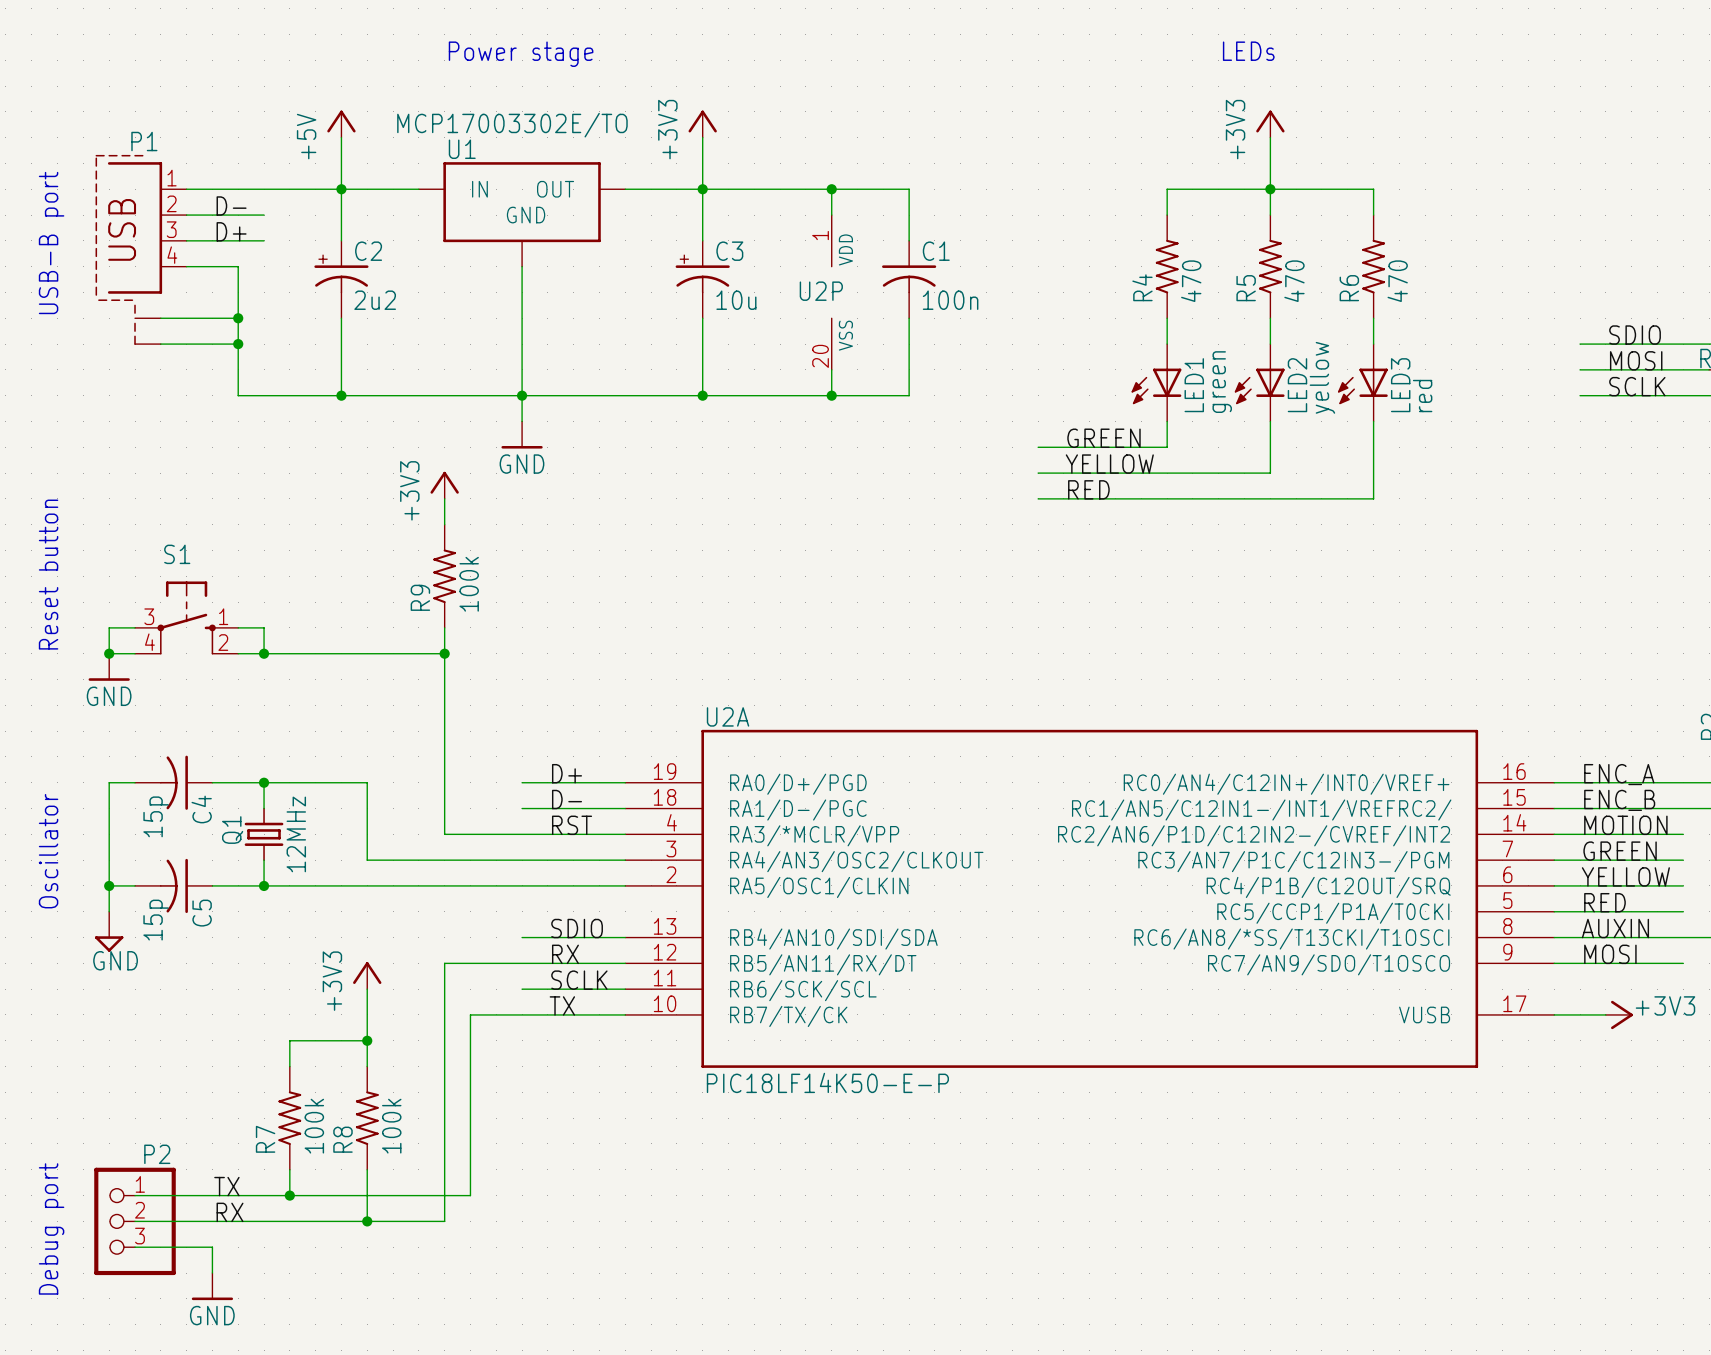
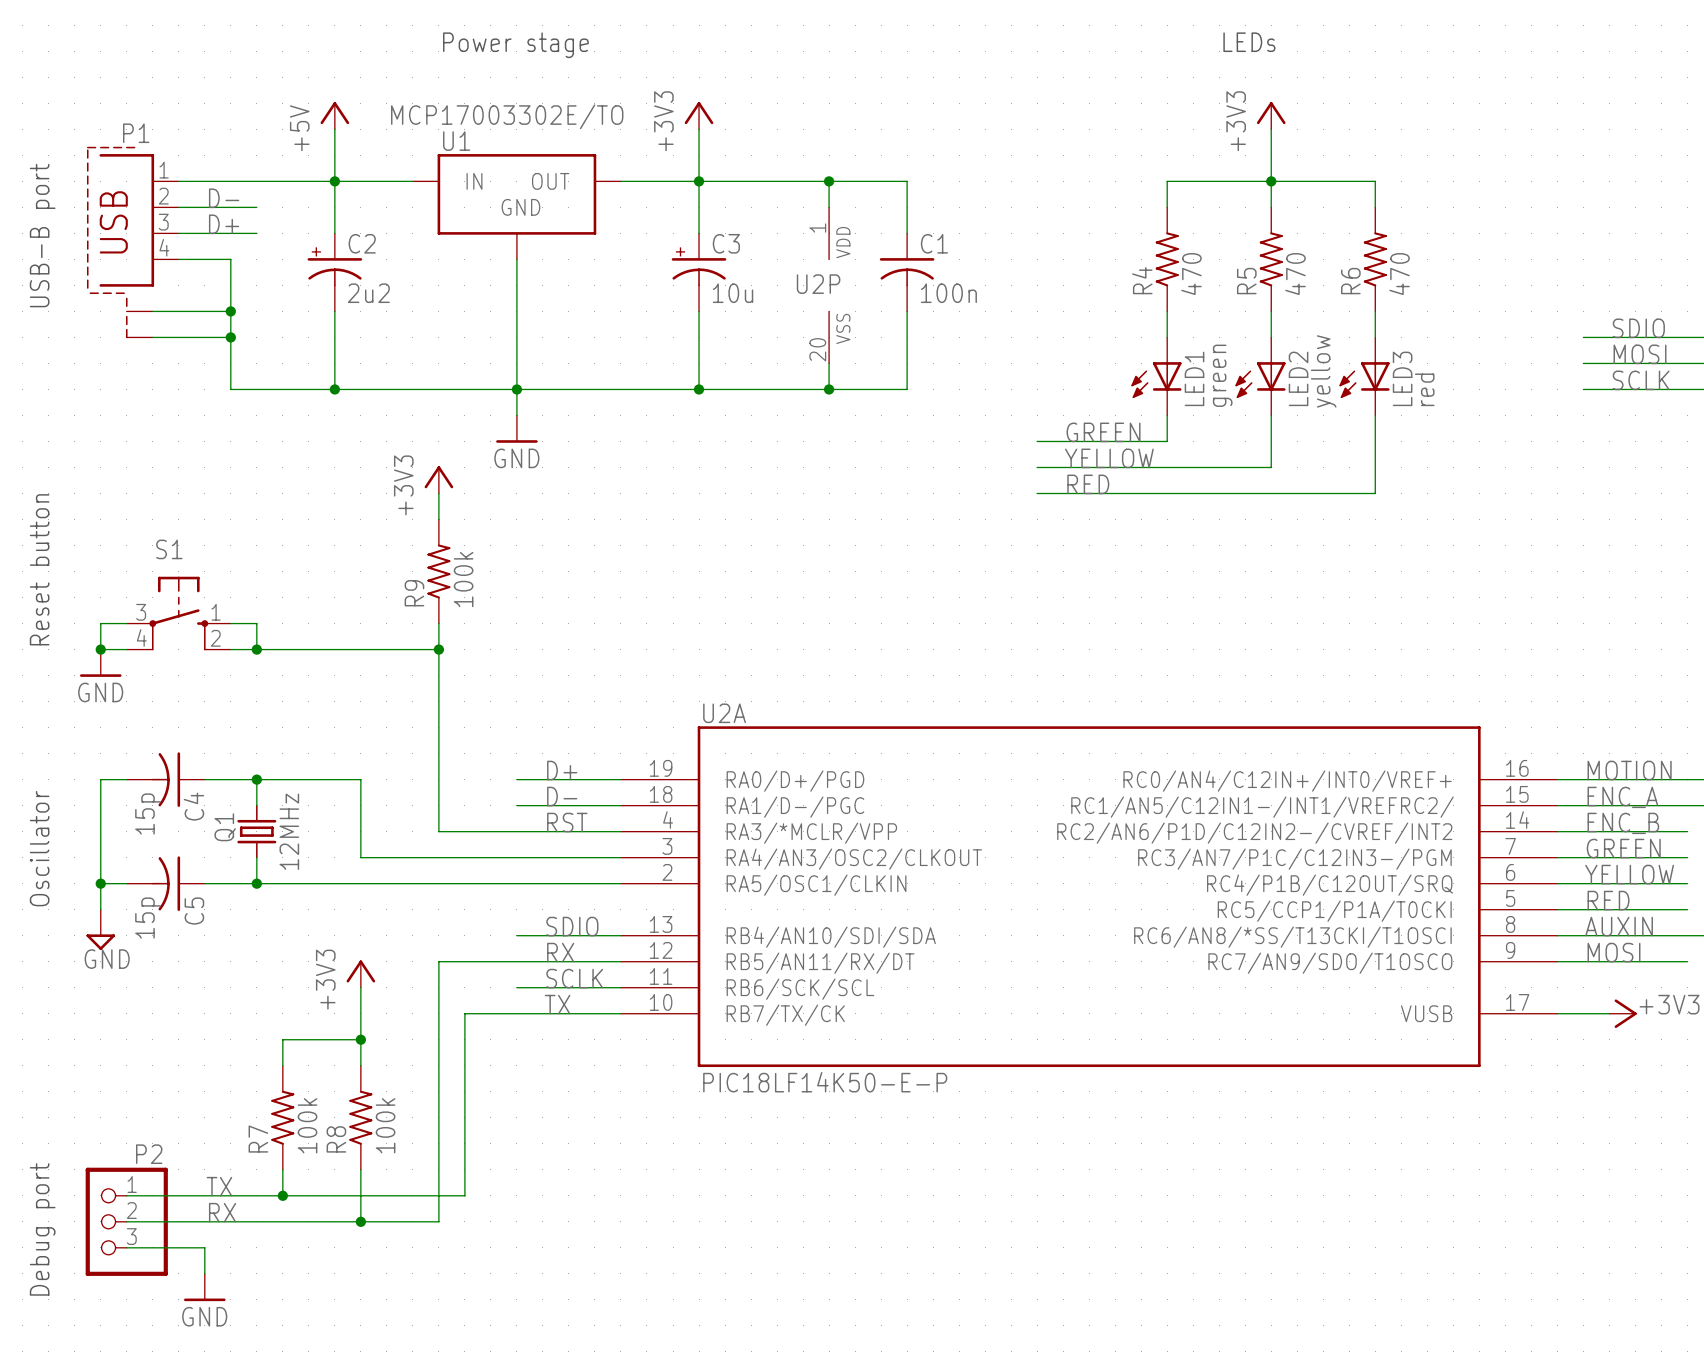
label: ENC_A (1619, 774) -> MOTION (1629, 770)
label: ENC_B (1619, 800) -> ENC_A (1622, 797)
label: MOTION (1625, 825) -> ENC_B (1623, 823)

